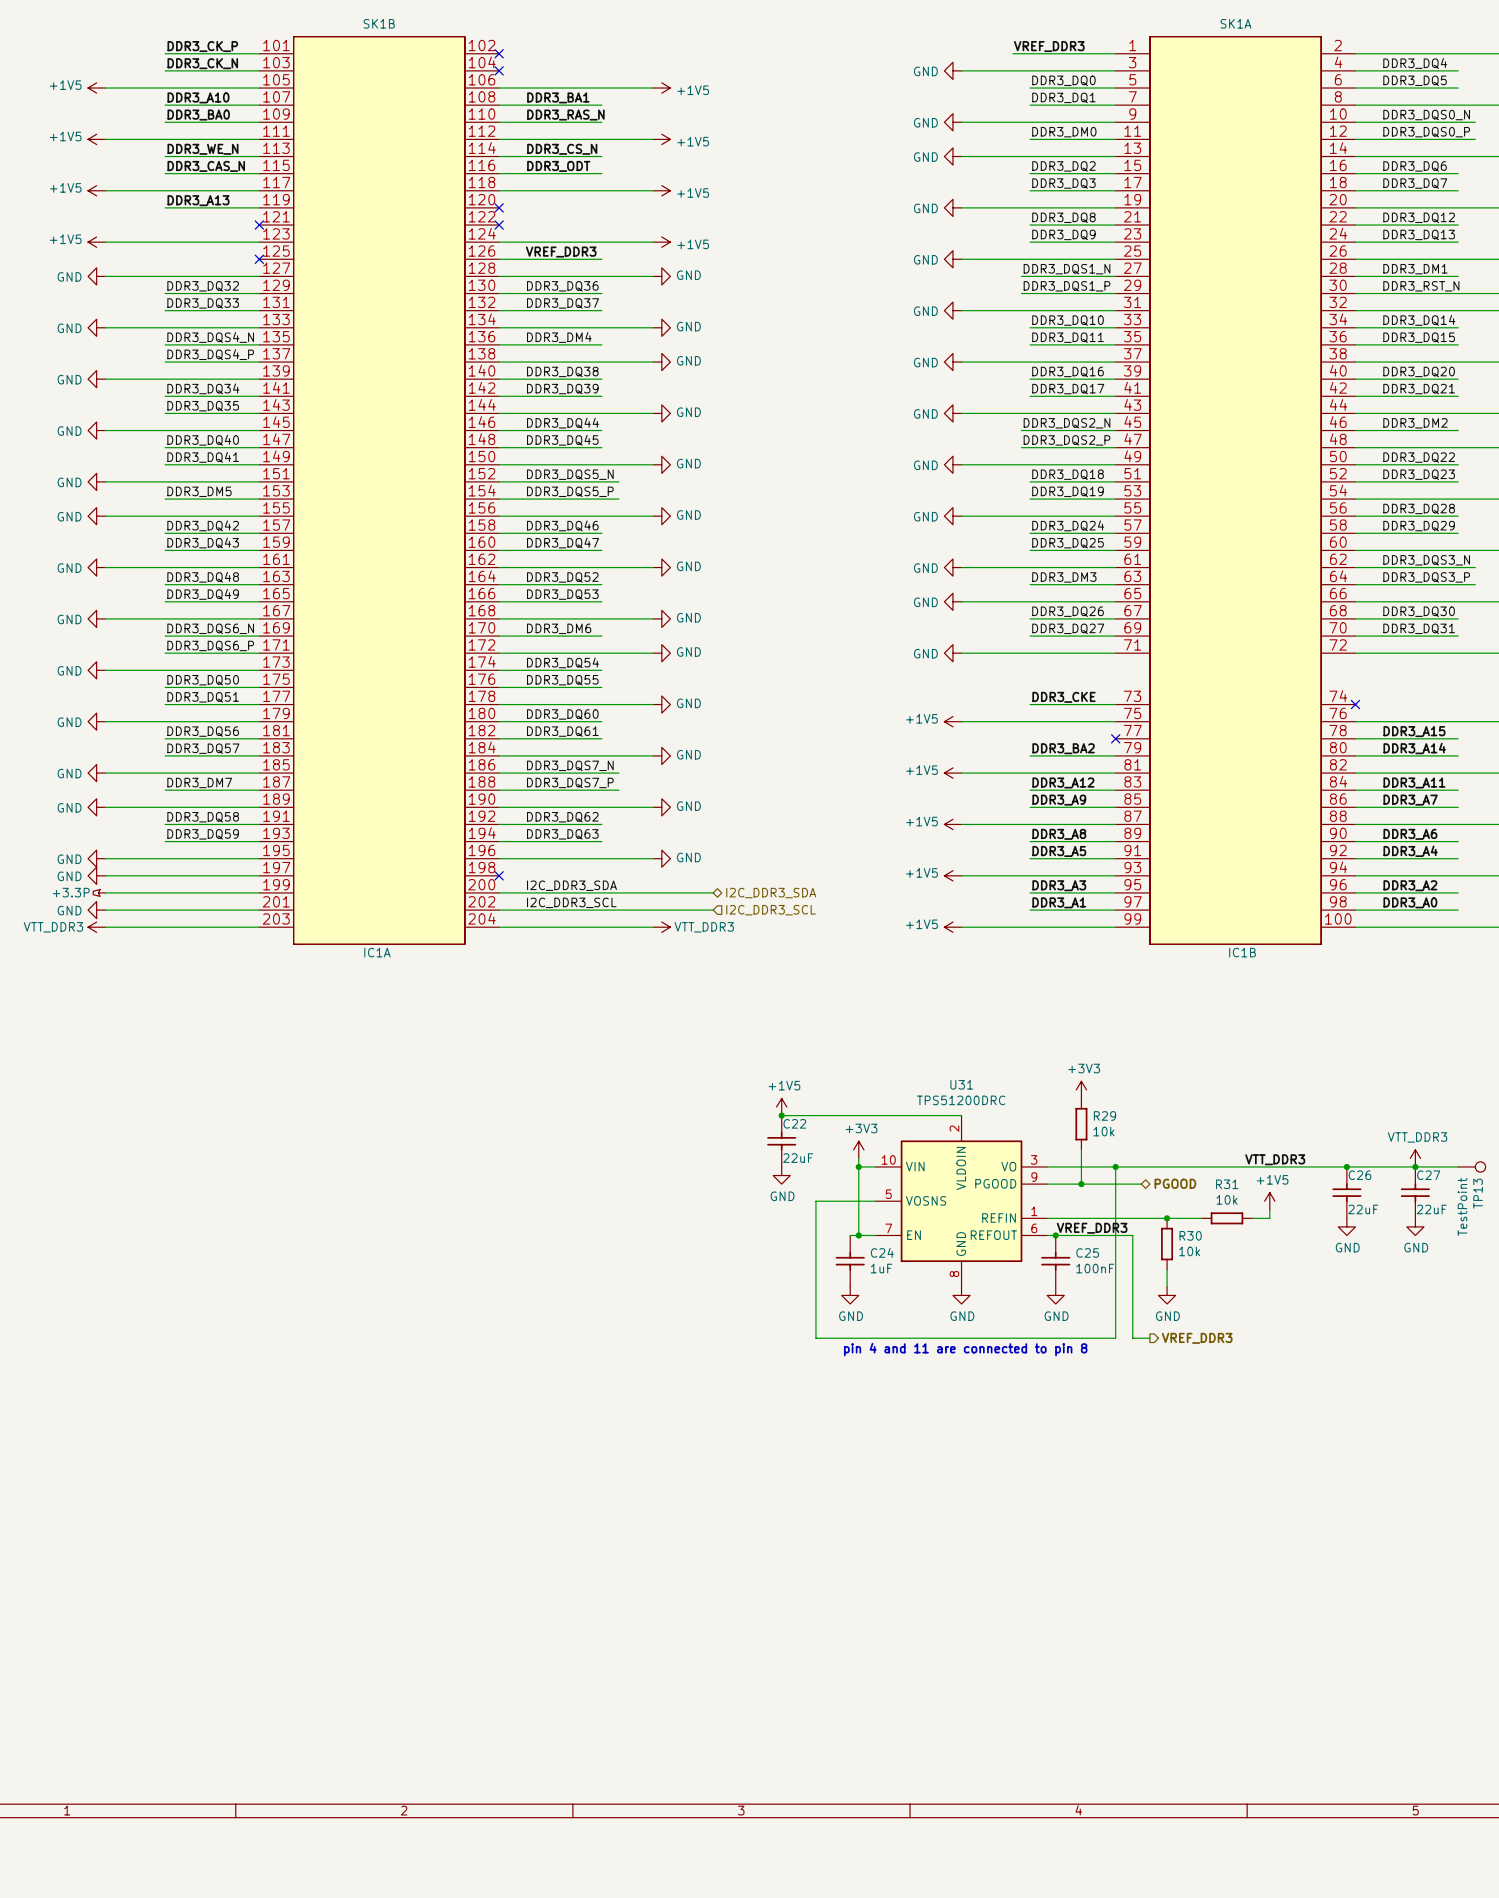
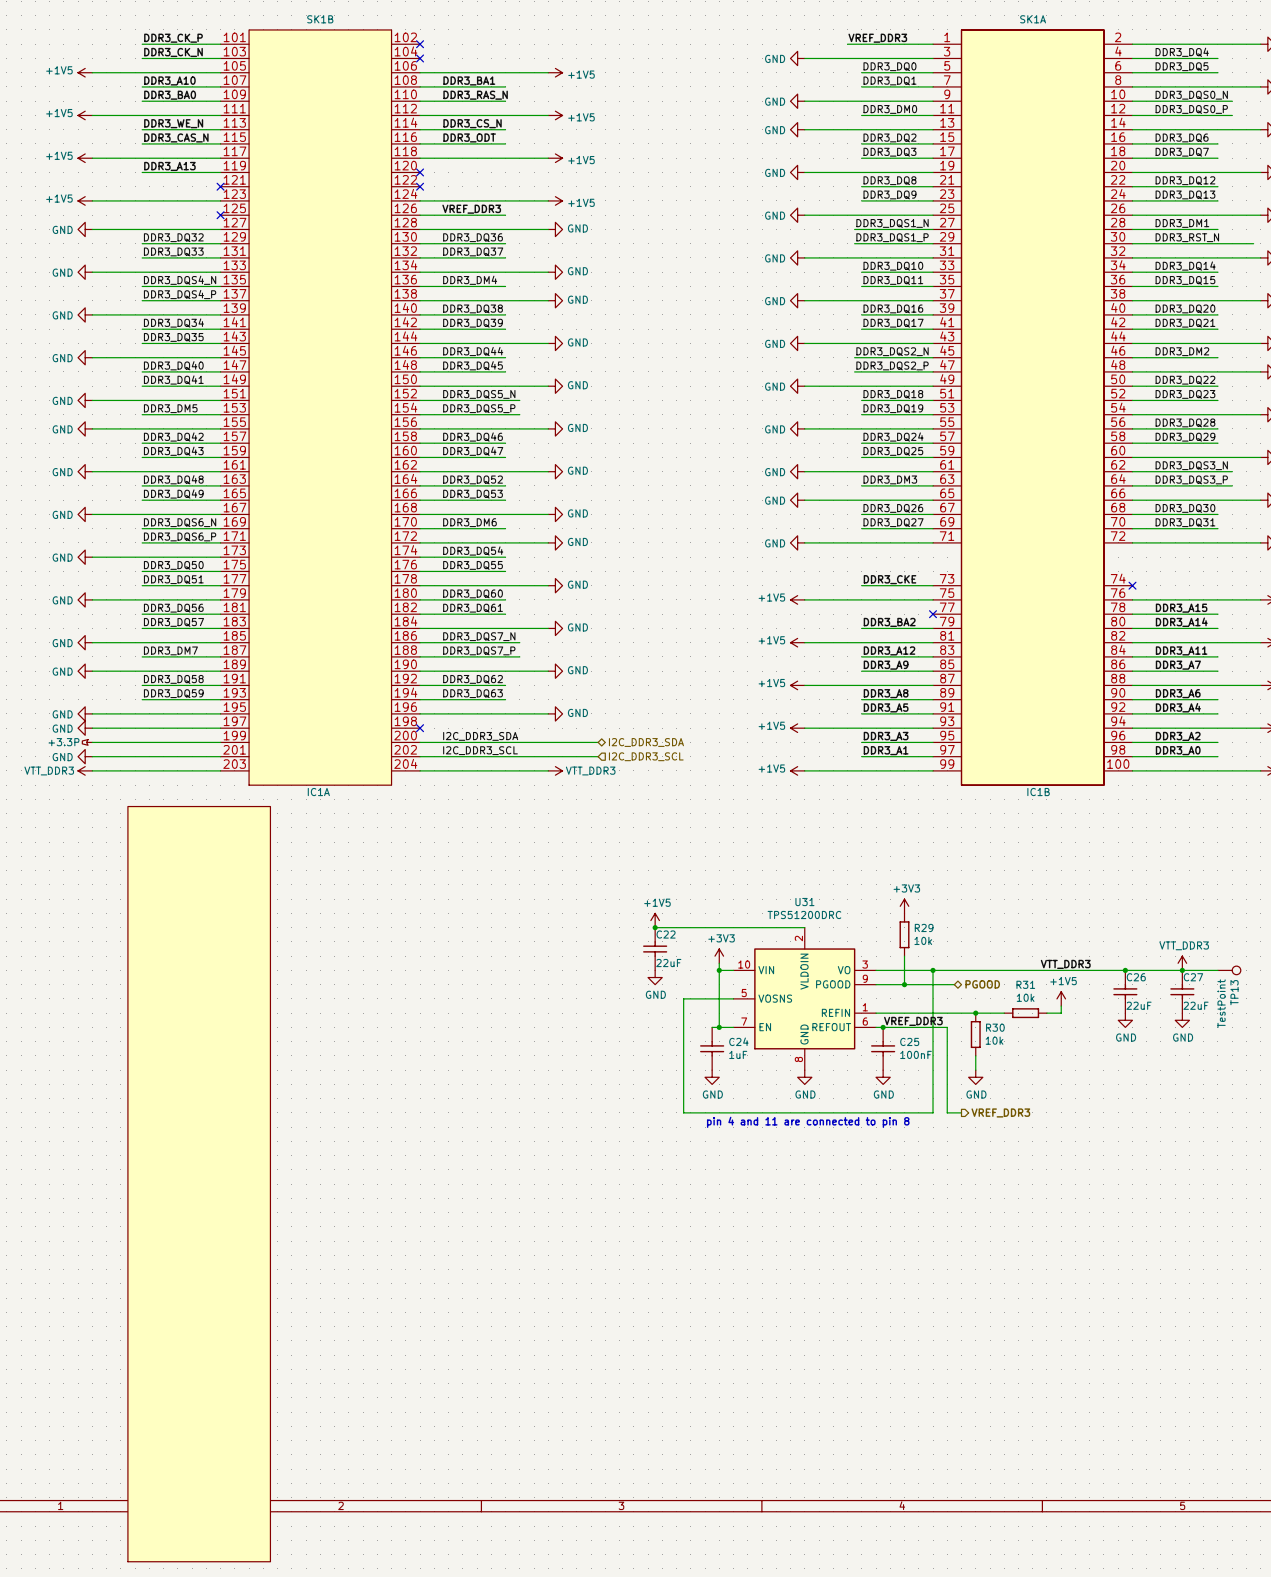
IC1A position: (379, 490) -> (199, 1184)

